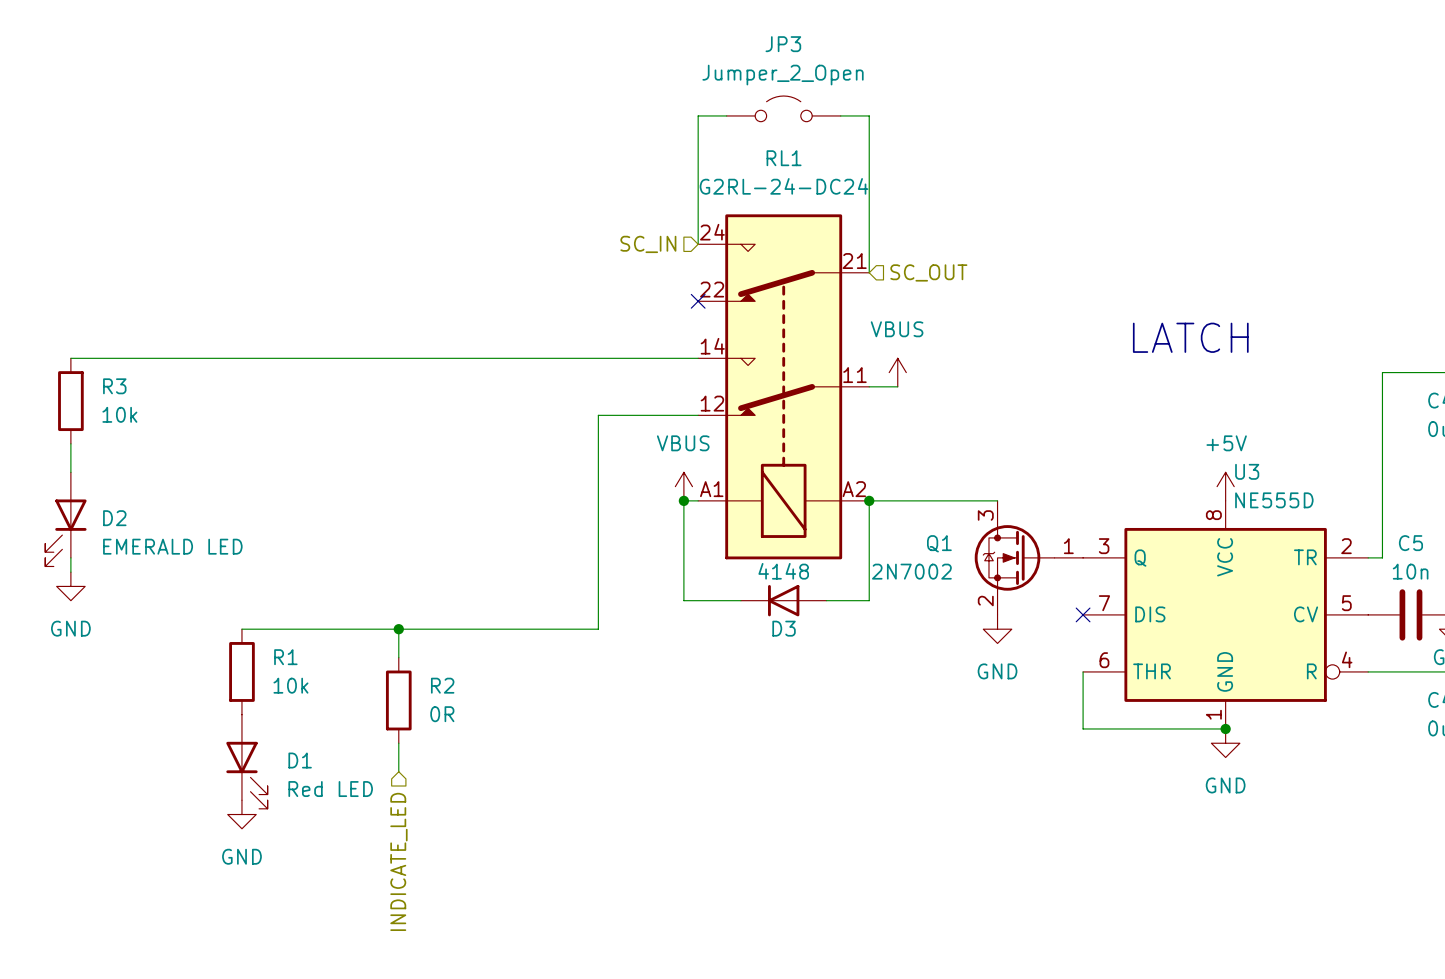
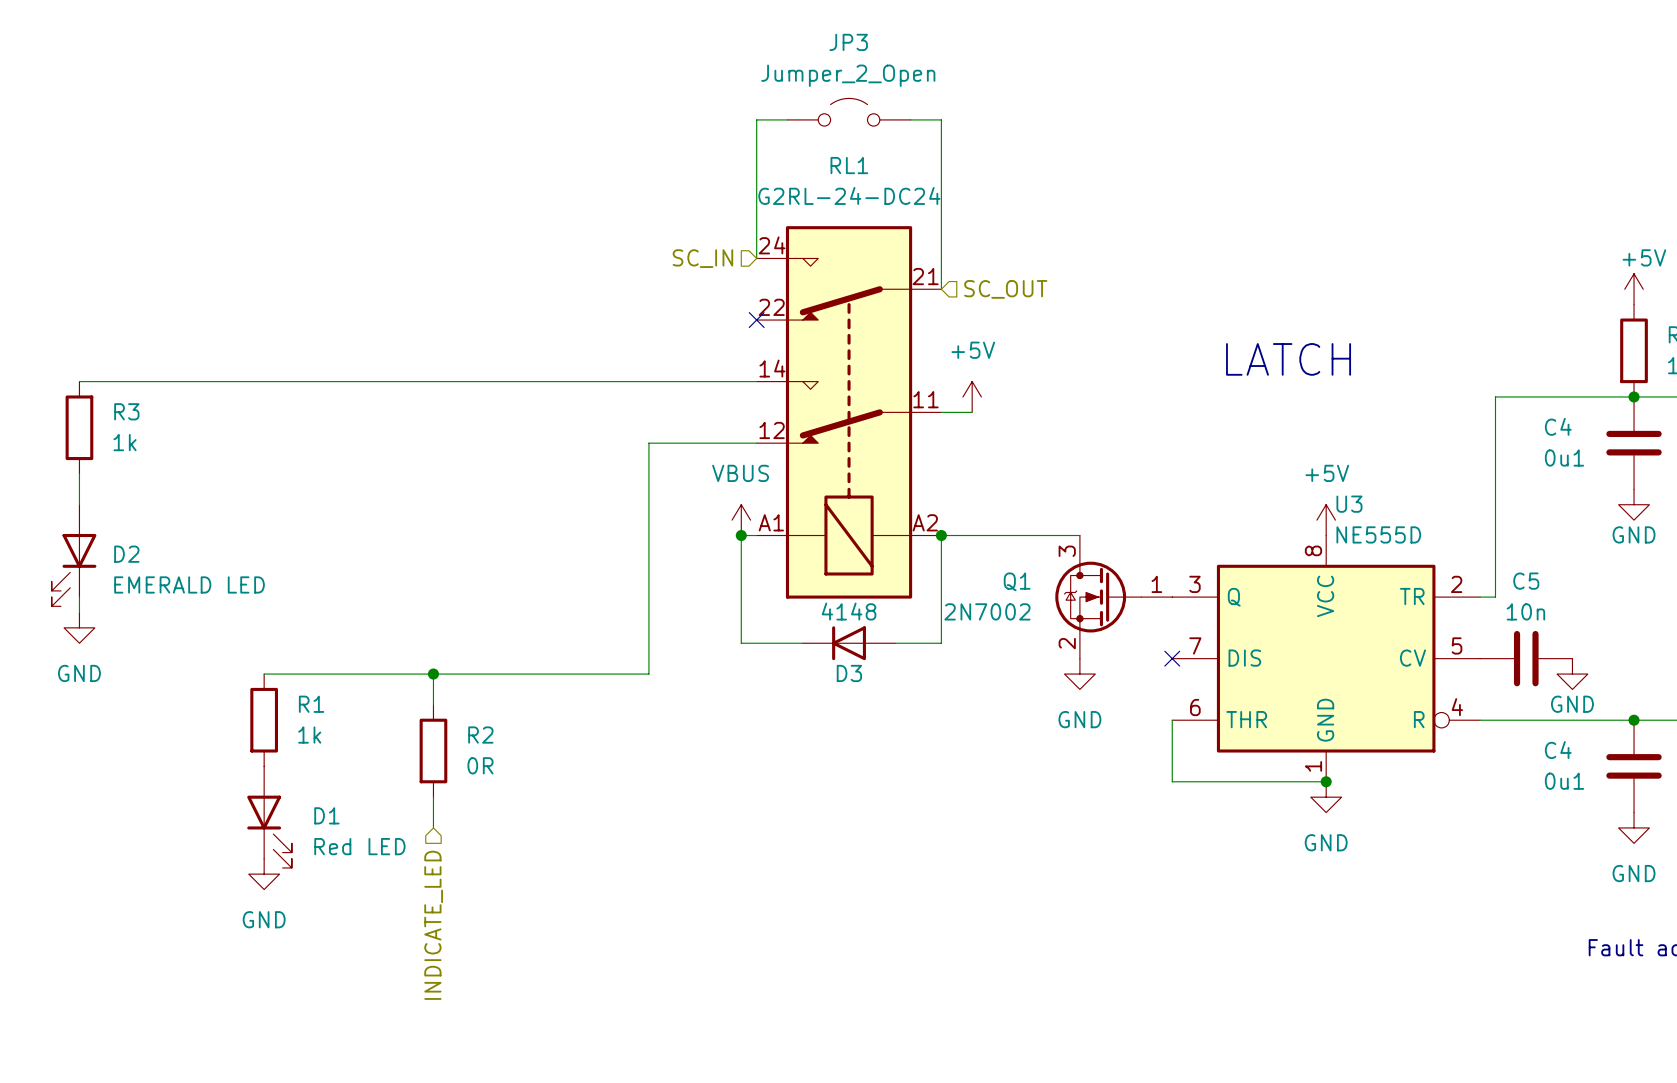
power symbol: VBUS (897, 372) -> +5V (972, 396)
R3 value: 10k (119, 414) -> 1k (125, 442)
R1 value: 10k (290, 685) -> 1k (309, 735)

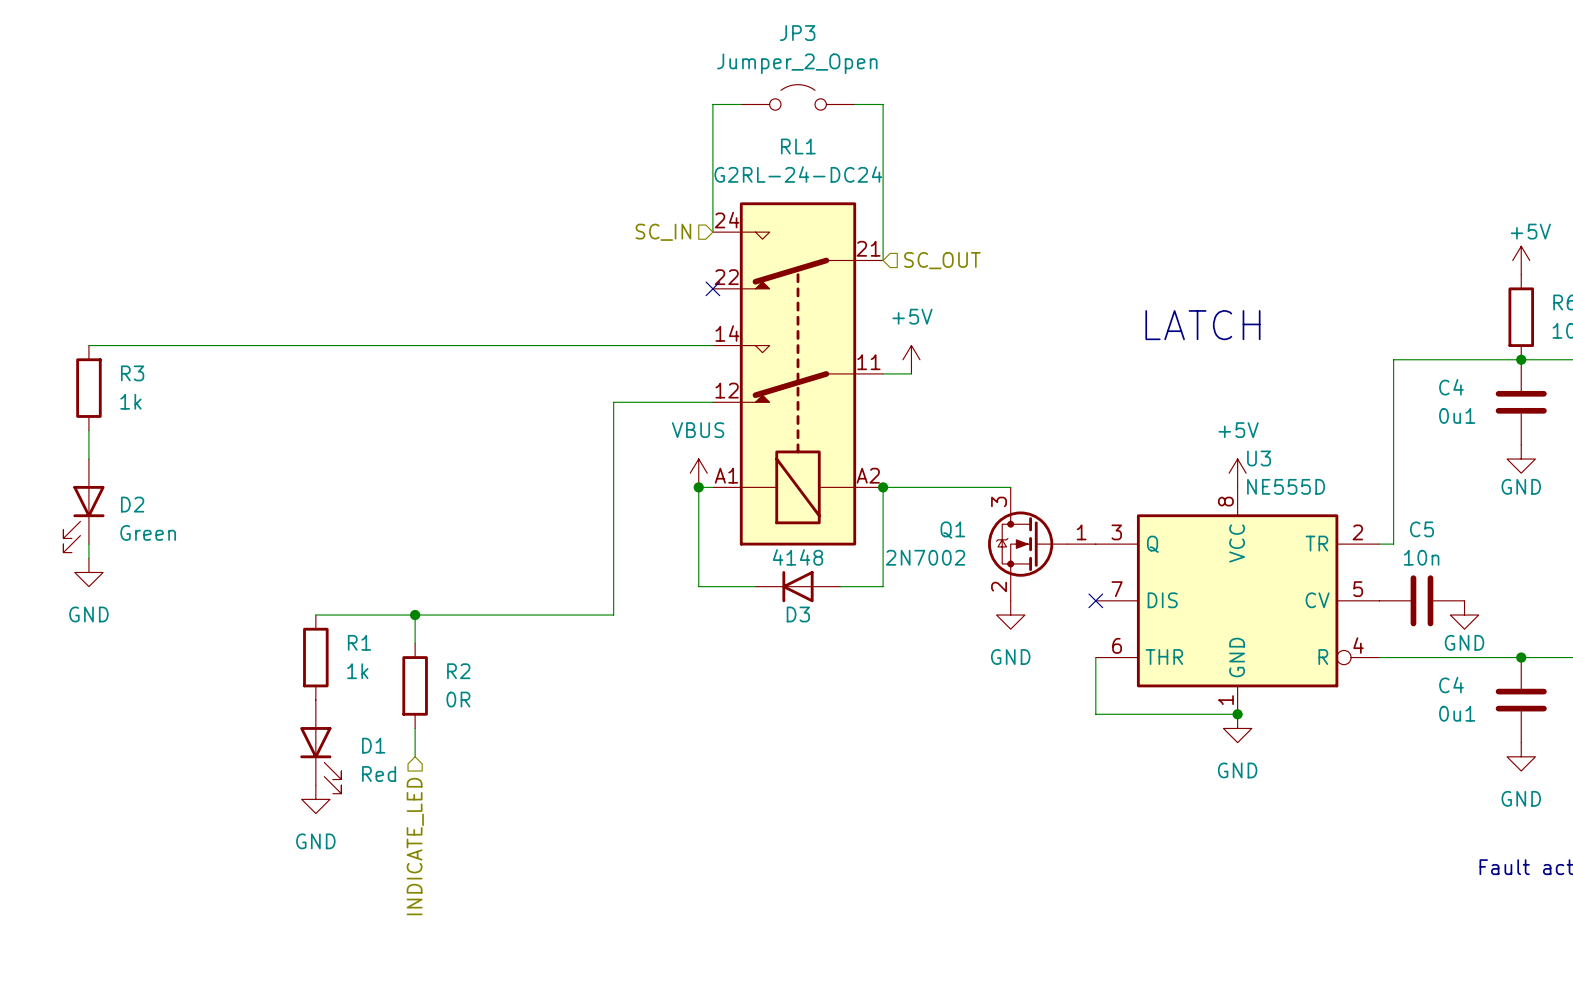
D2 value: EMERALD LED (189, 584) -> Green (148, 532)
wire: (264, 674) (325, 674) -> none
R1 position: (264, 720) -> (315, 657)
D1 position: (269, 817) -> (320, 746)
D1 value: Red LED (359, 846) -> Red (379, 774)
power symbol position: GND (264, 874) -> GND (315, 799)

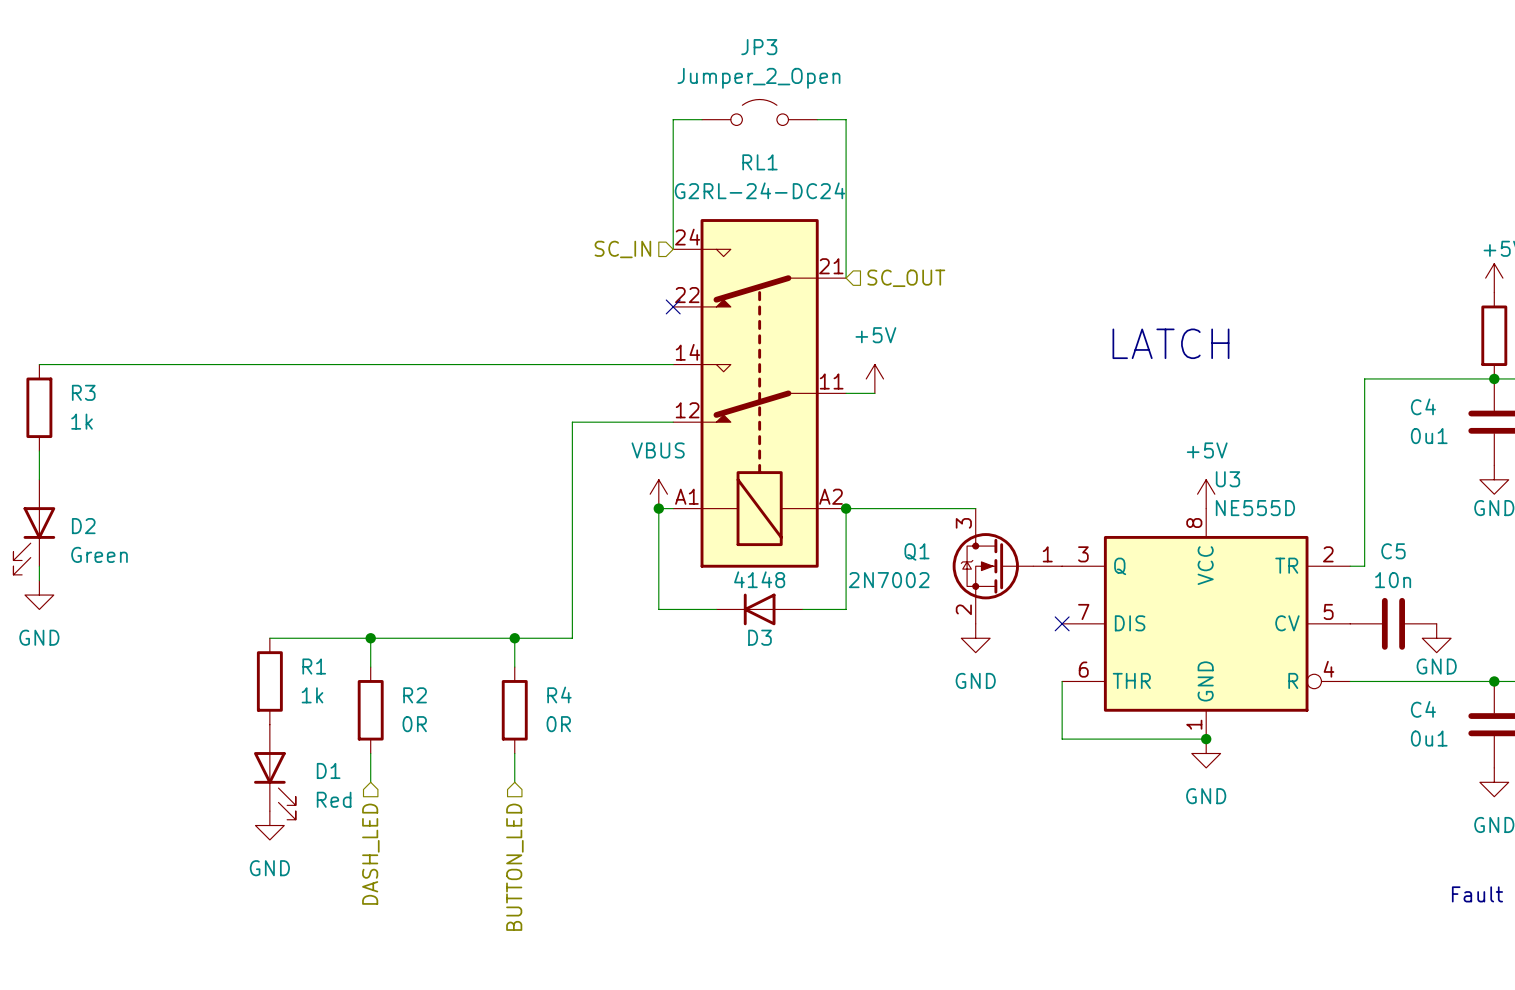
wire: none -> (514, 638) (514, 667)
junction: none -> (514, 638)
R4: none -> 0R (514, 710)
wire: none -> (514, 753) (514, 782)
hierarchical label: none -> BUTTON_LED (514, 867)
hierarchical label: INDICATE_LED (415, 846) -> DASH_LED (370, 854)

